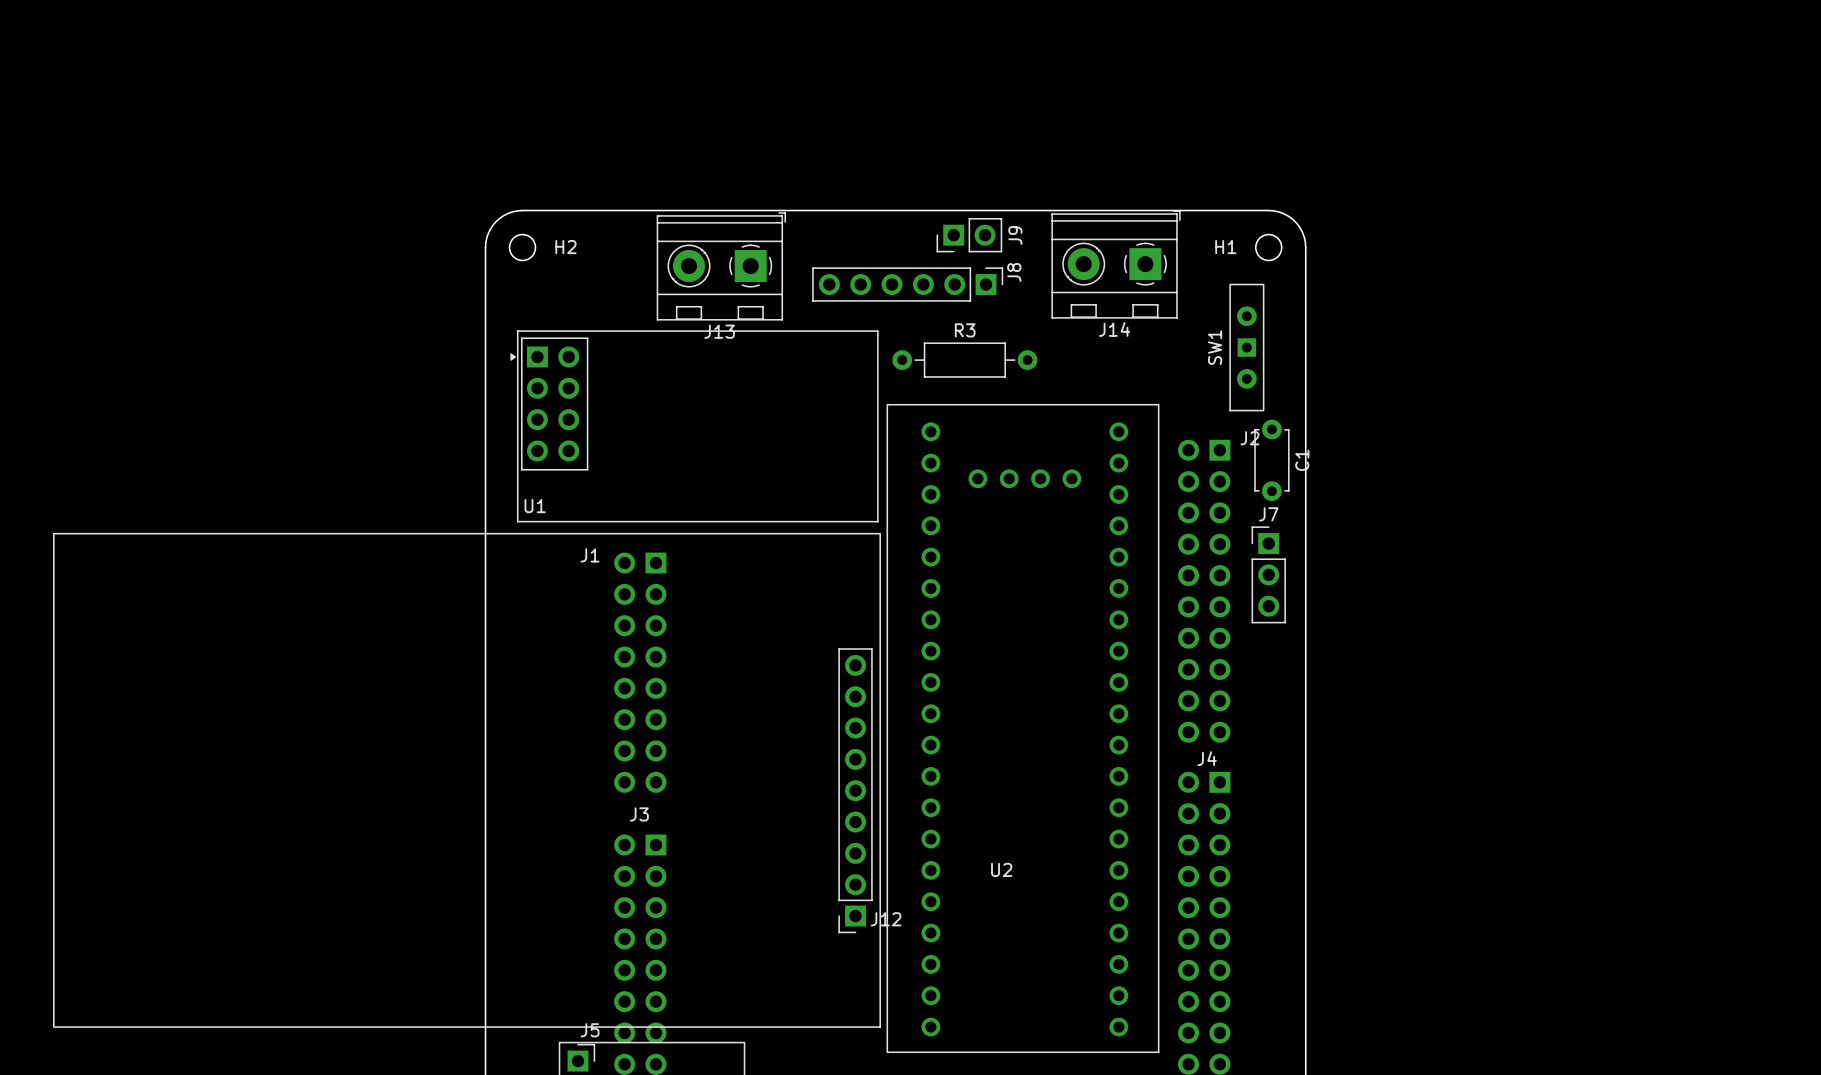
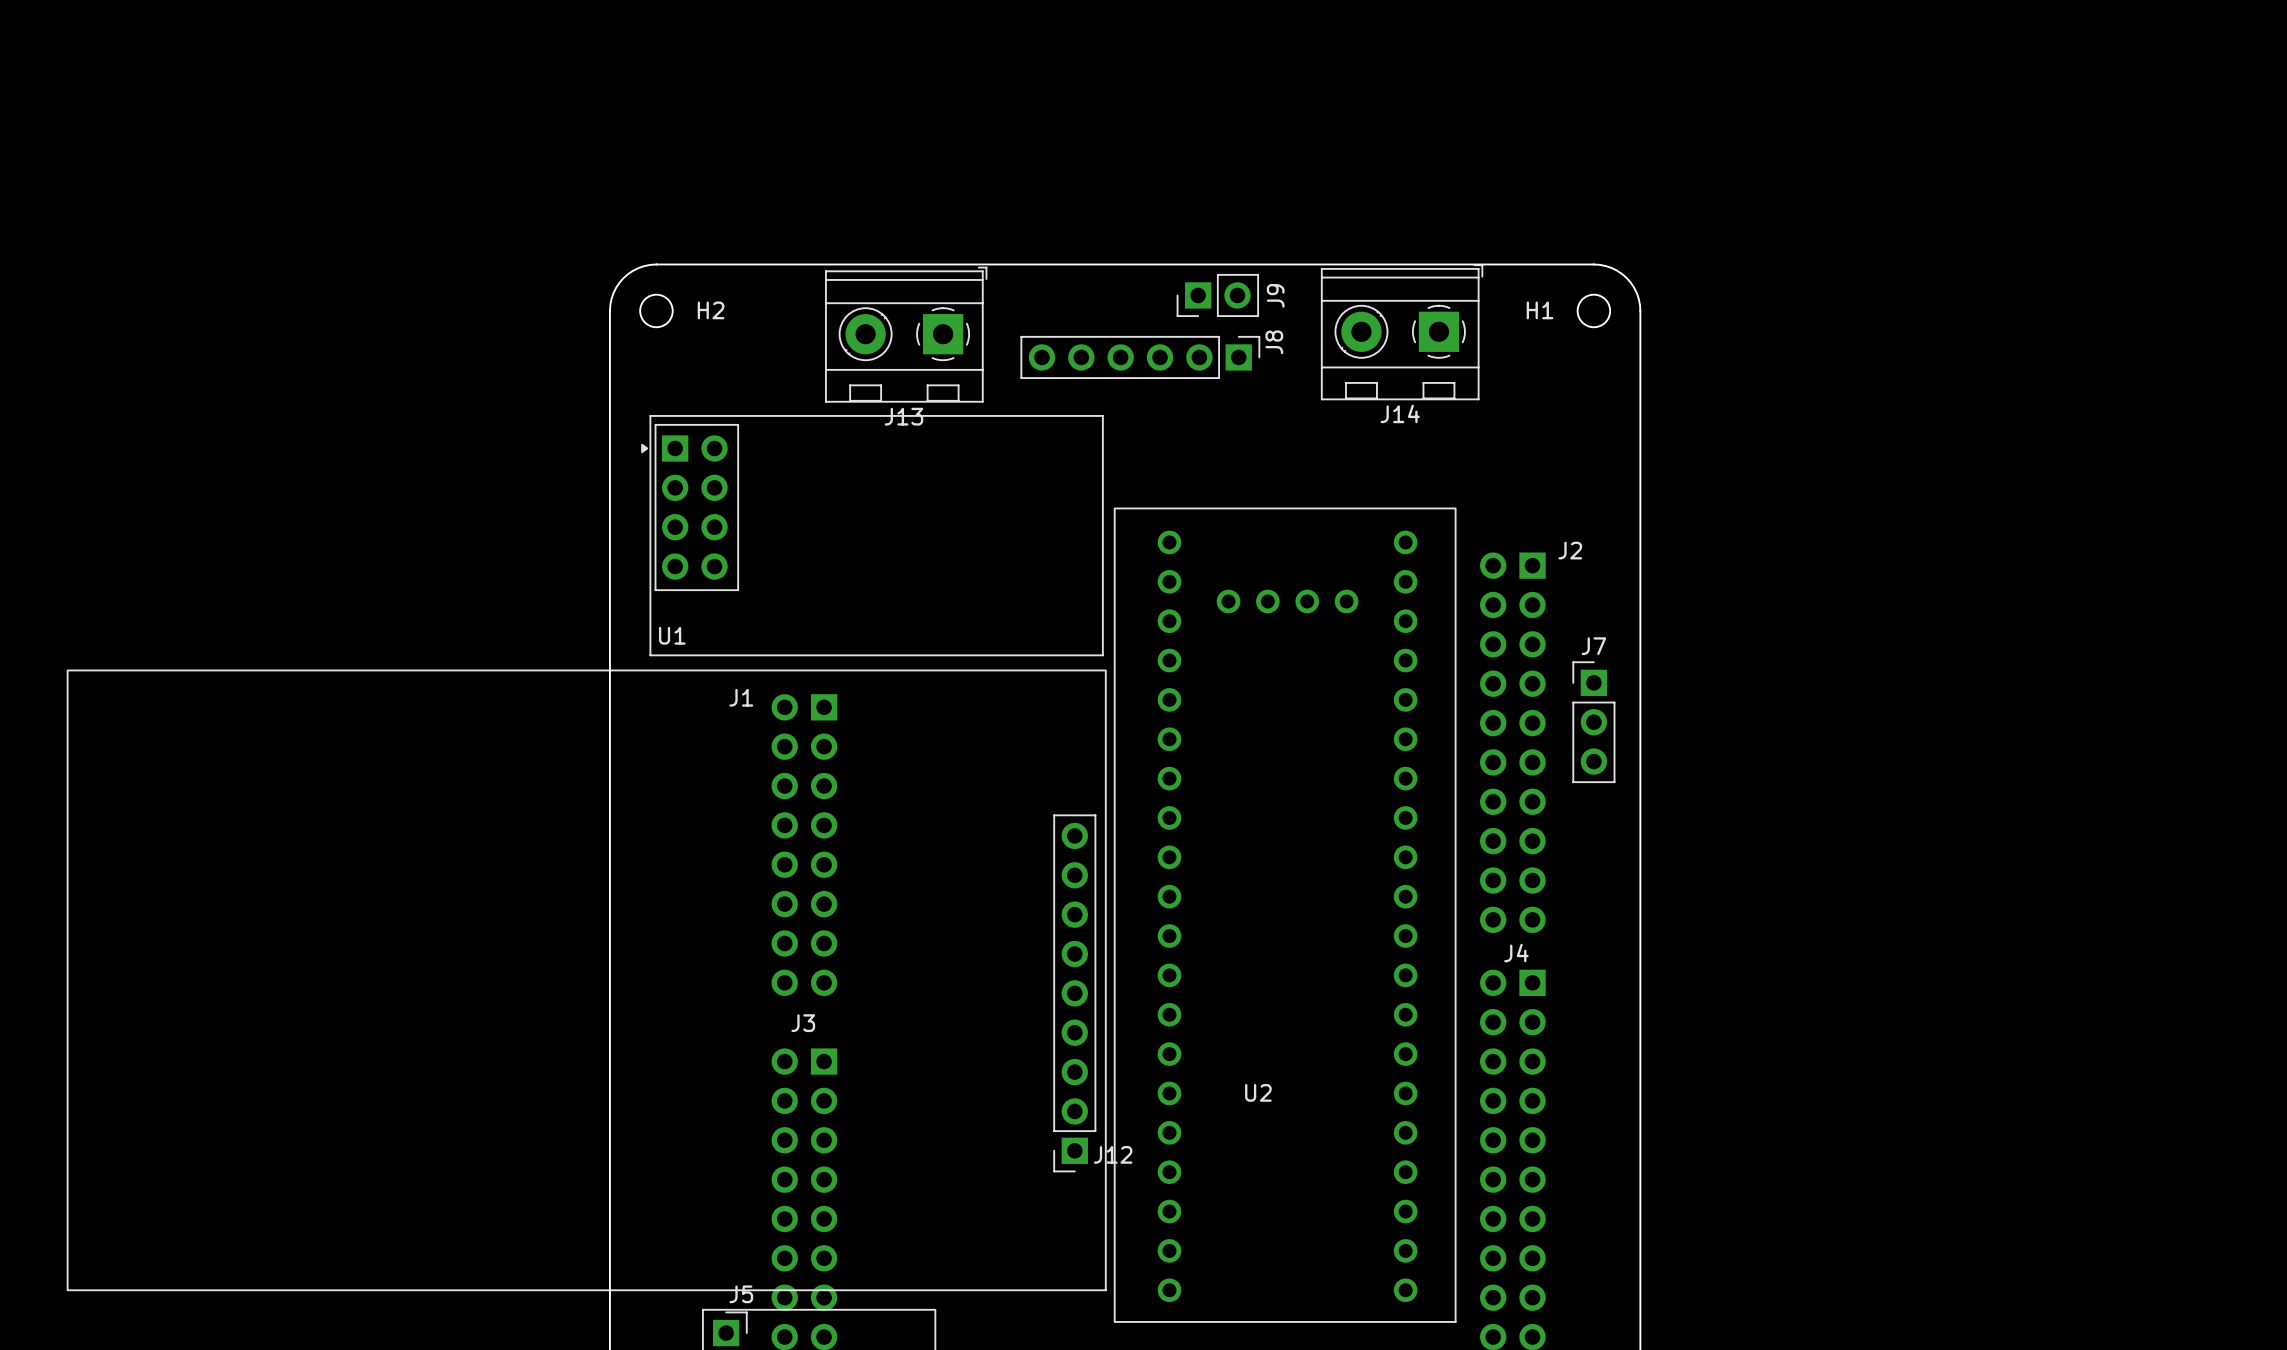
SW1: (1246, 347) -> none
R3: (964, 360) -> none
C1: (1271, 460) -> none

